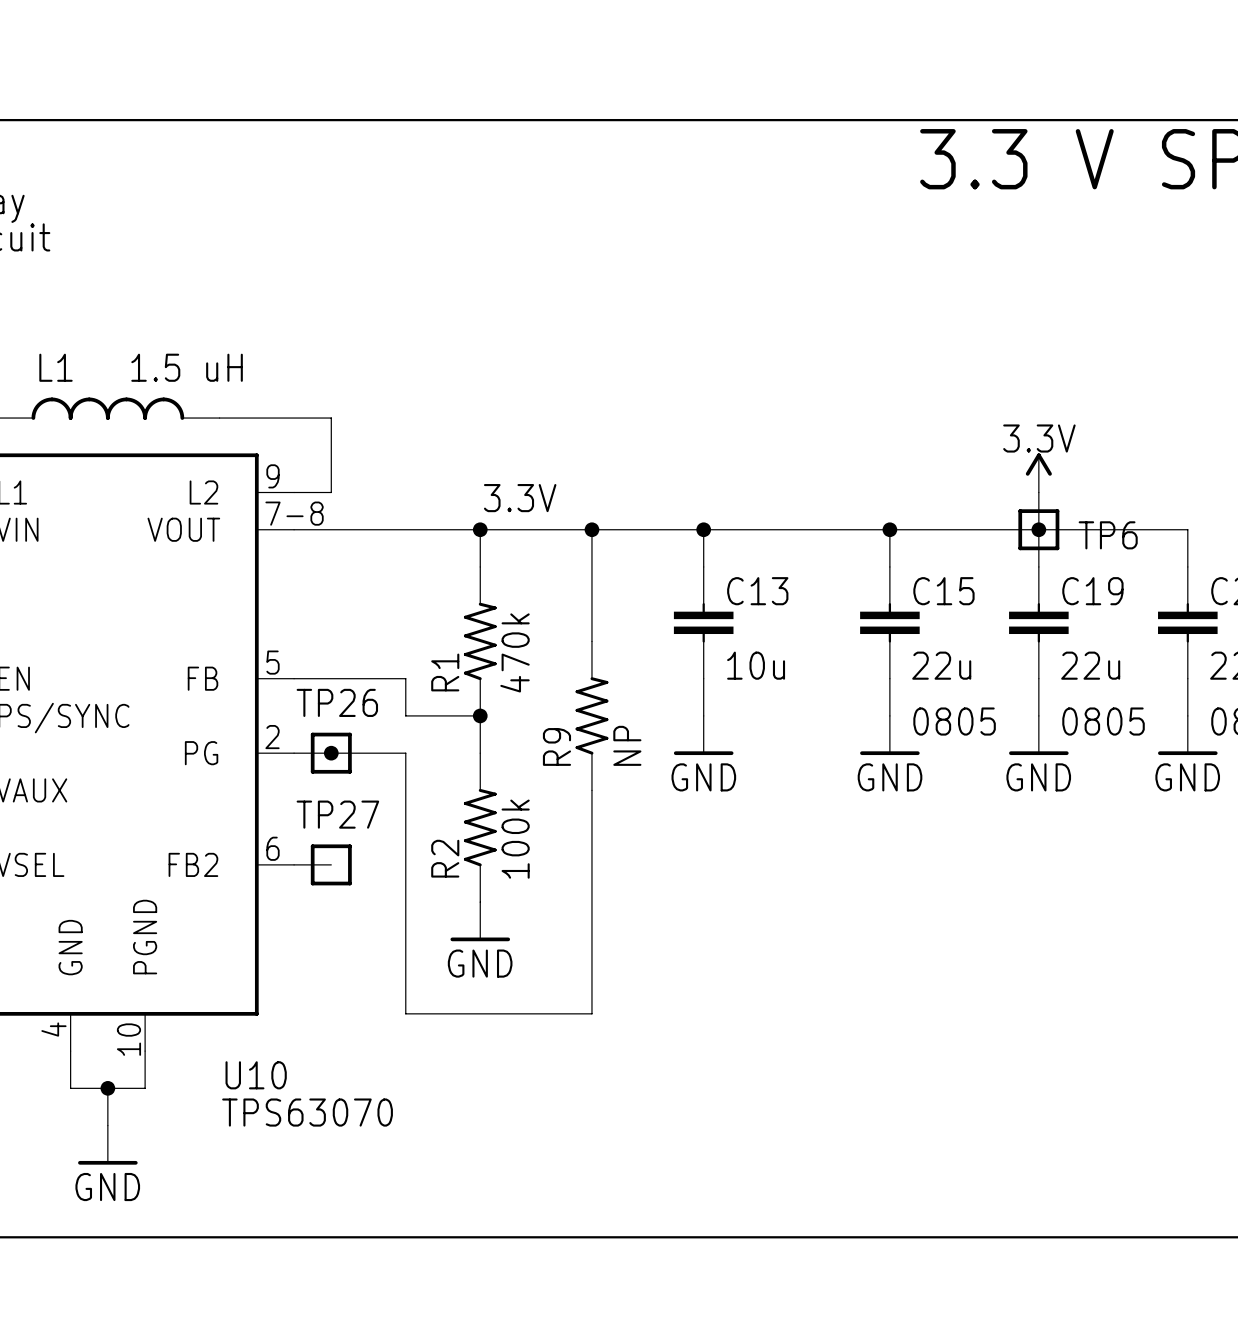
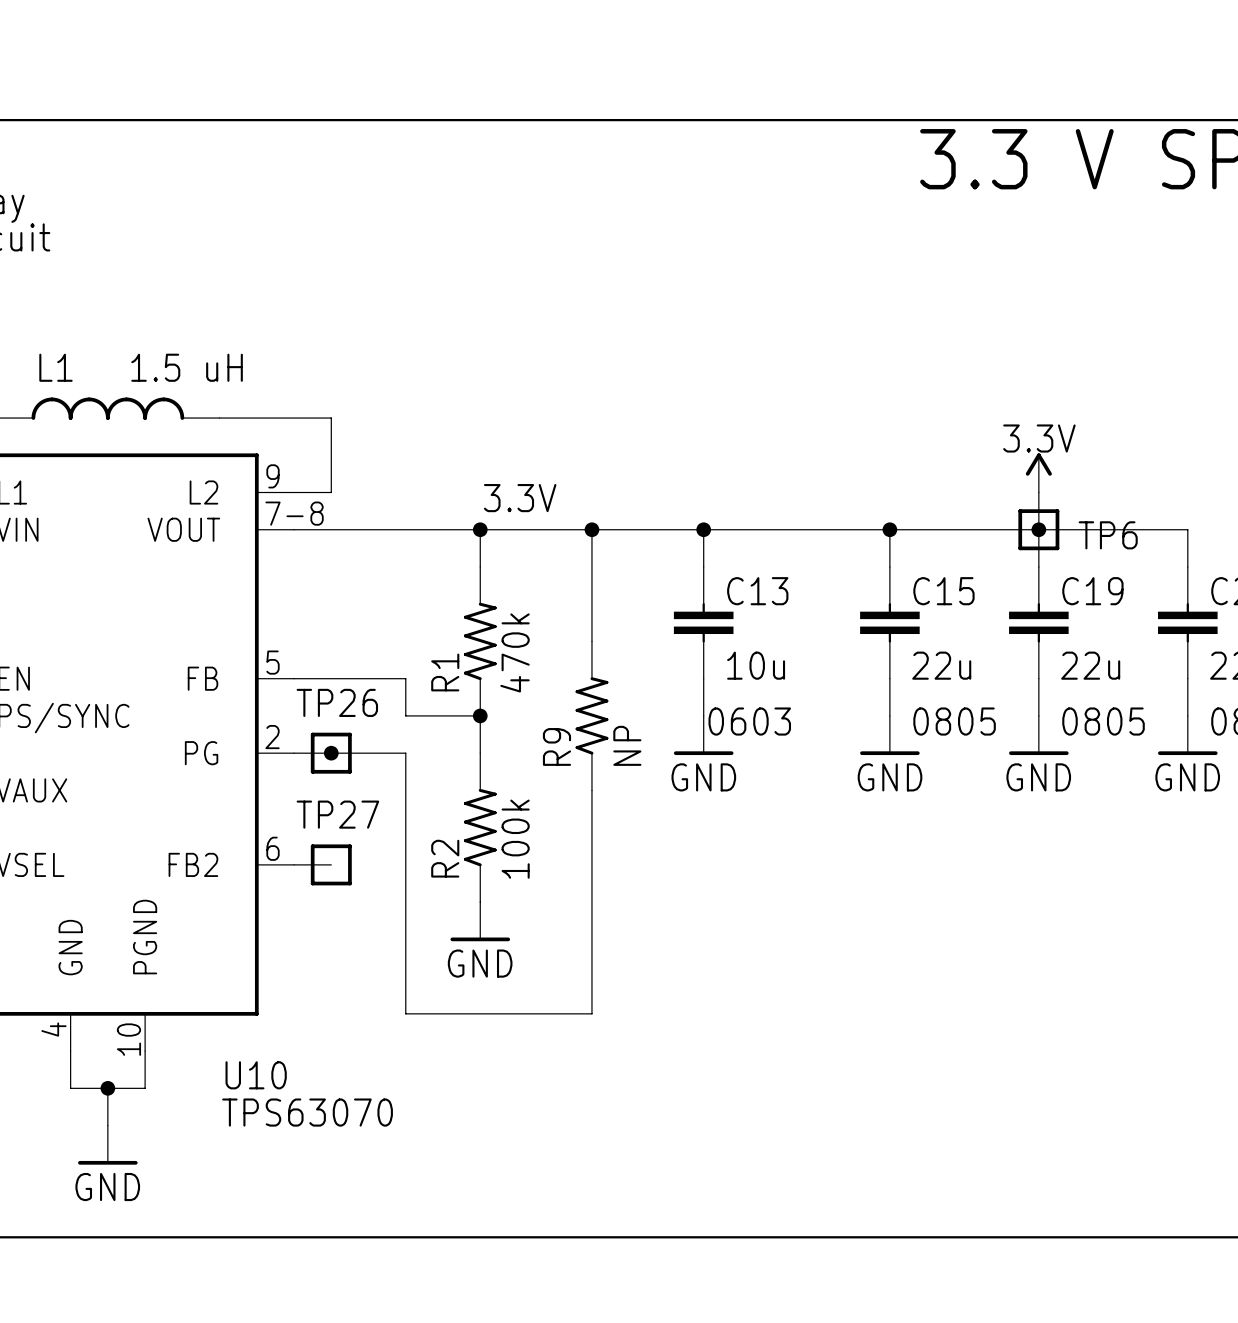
text: none -> 0603 (749, 721)

